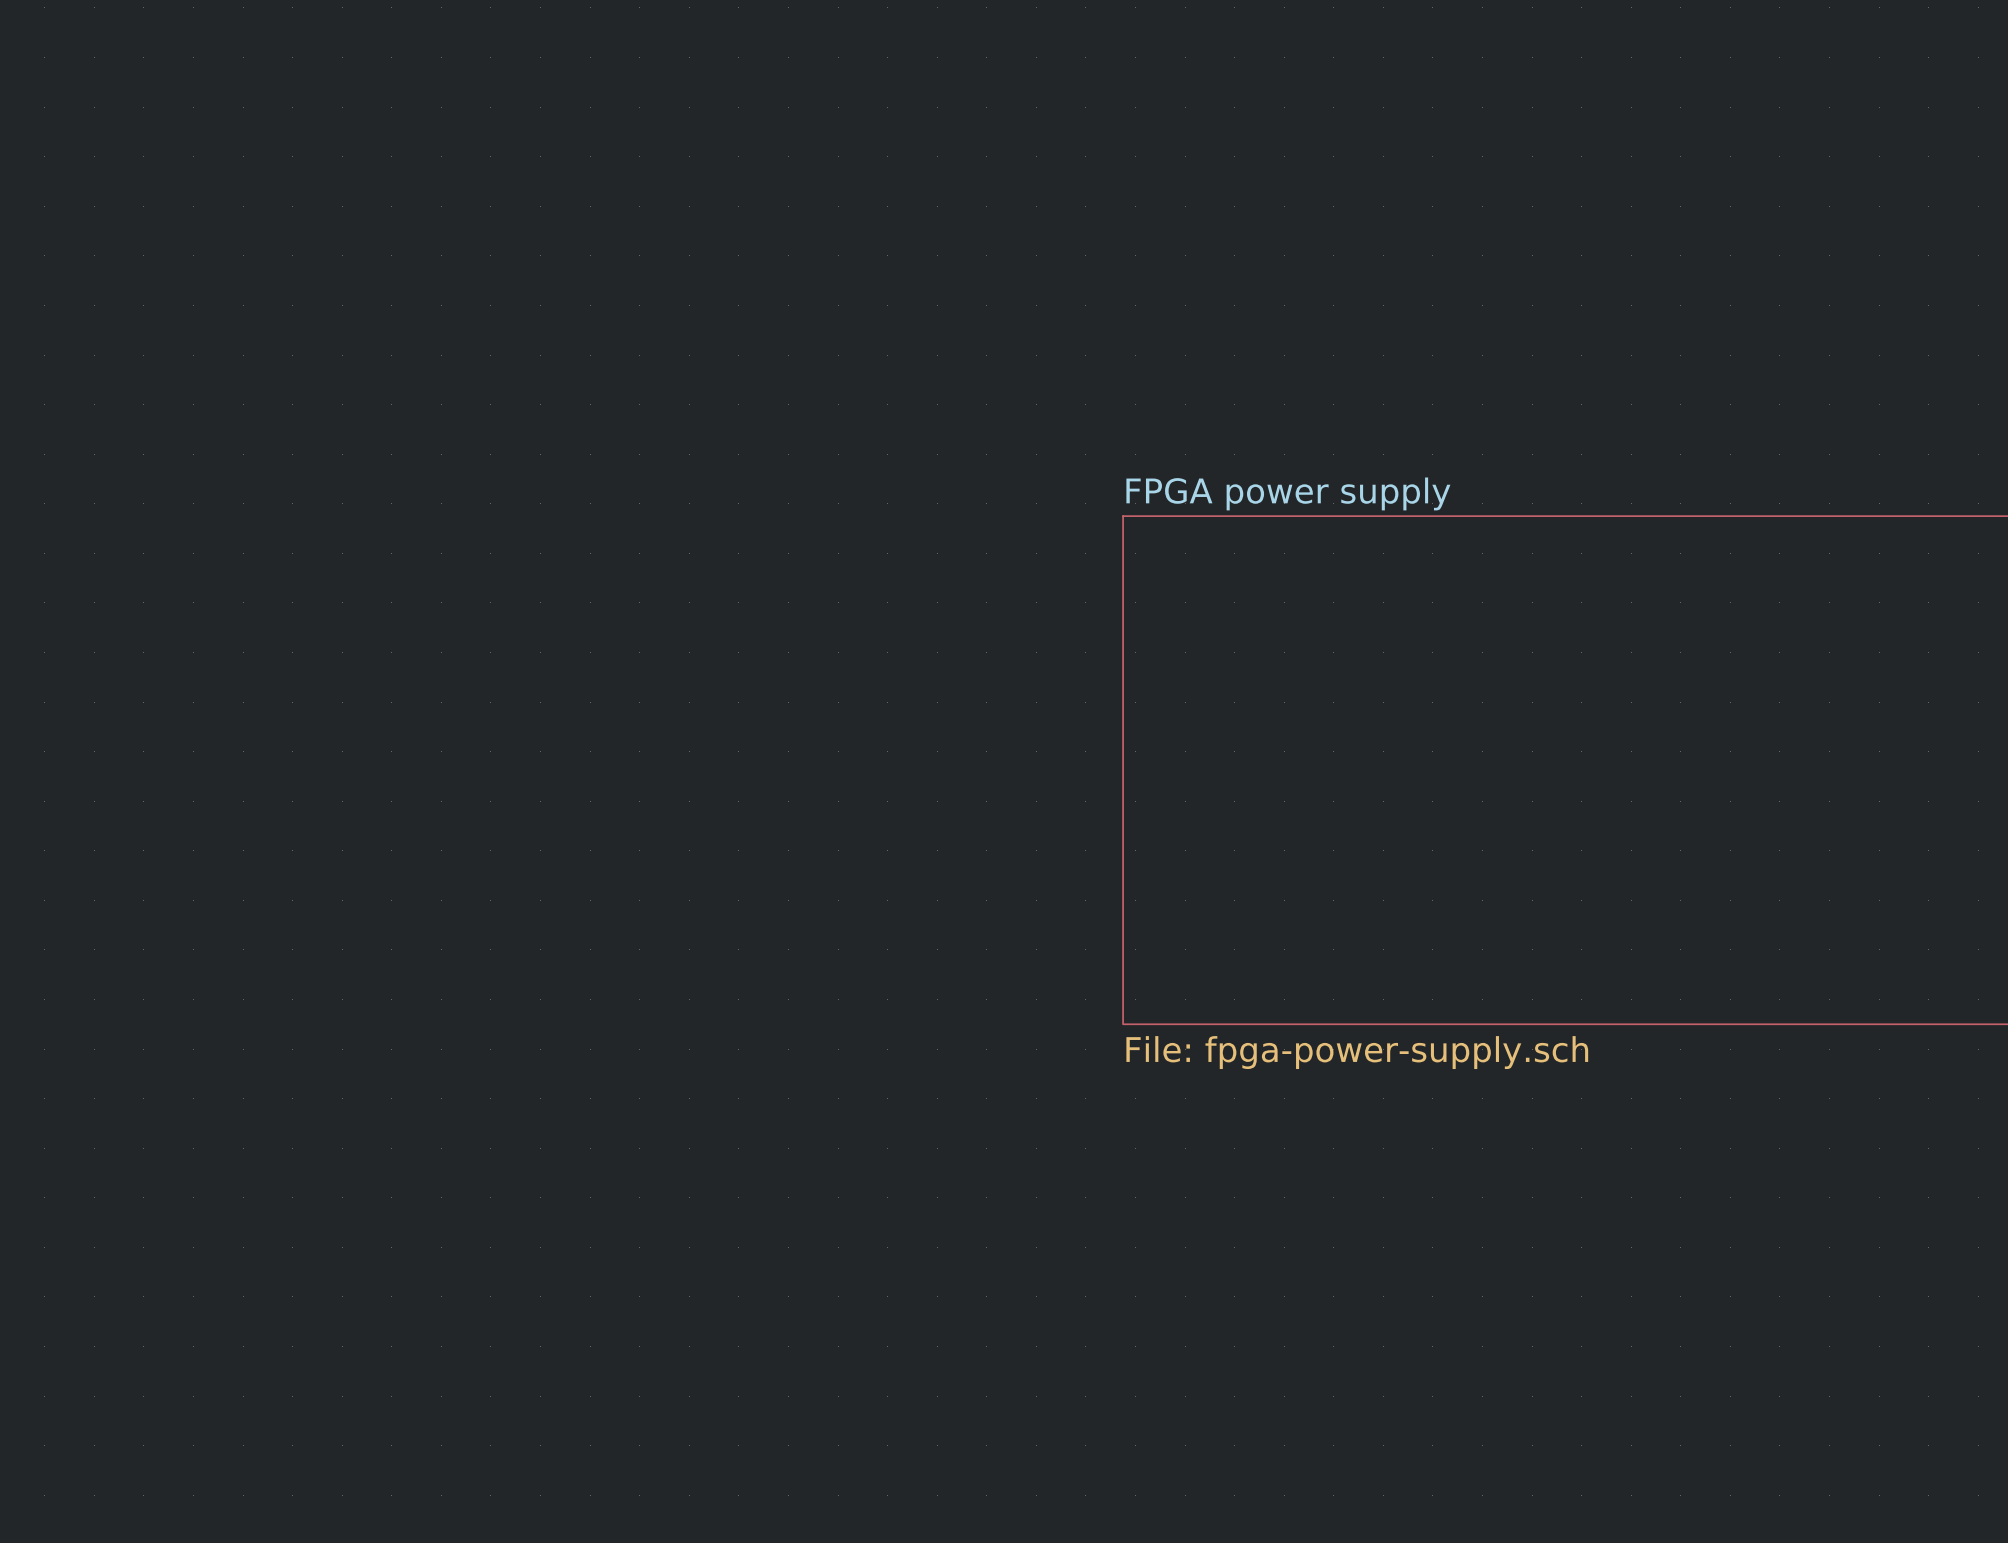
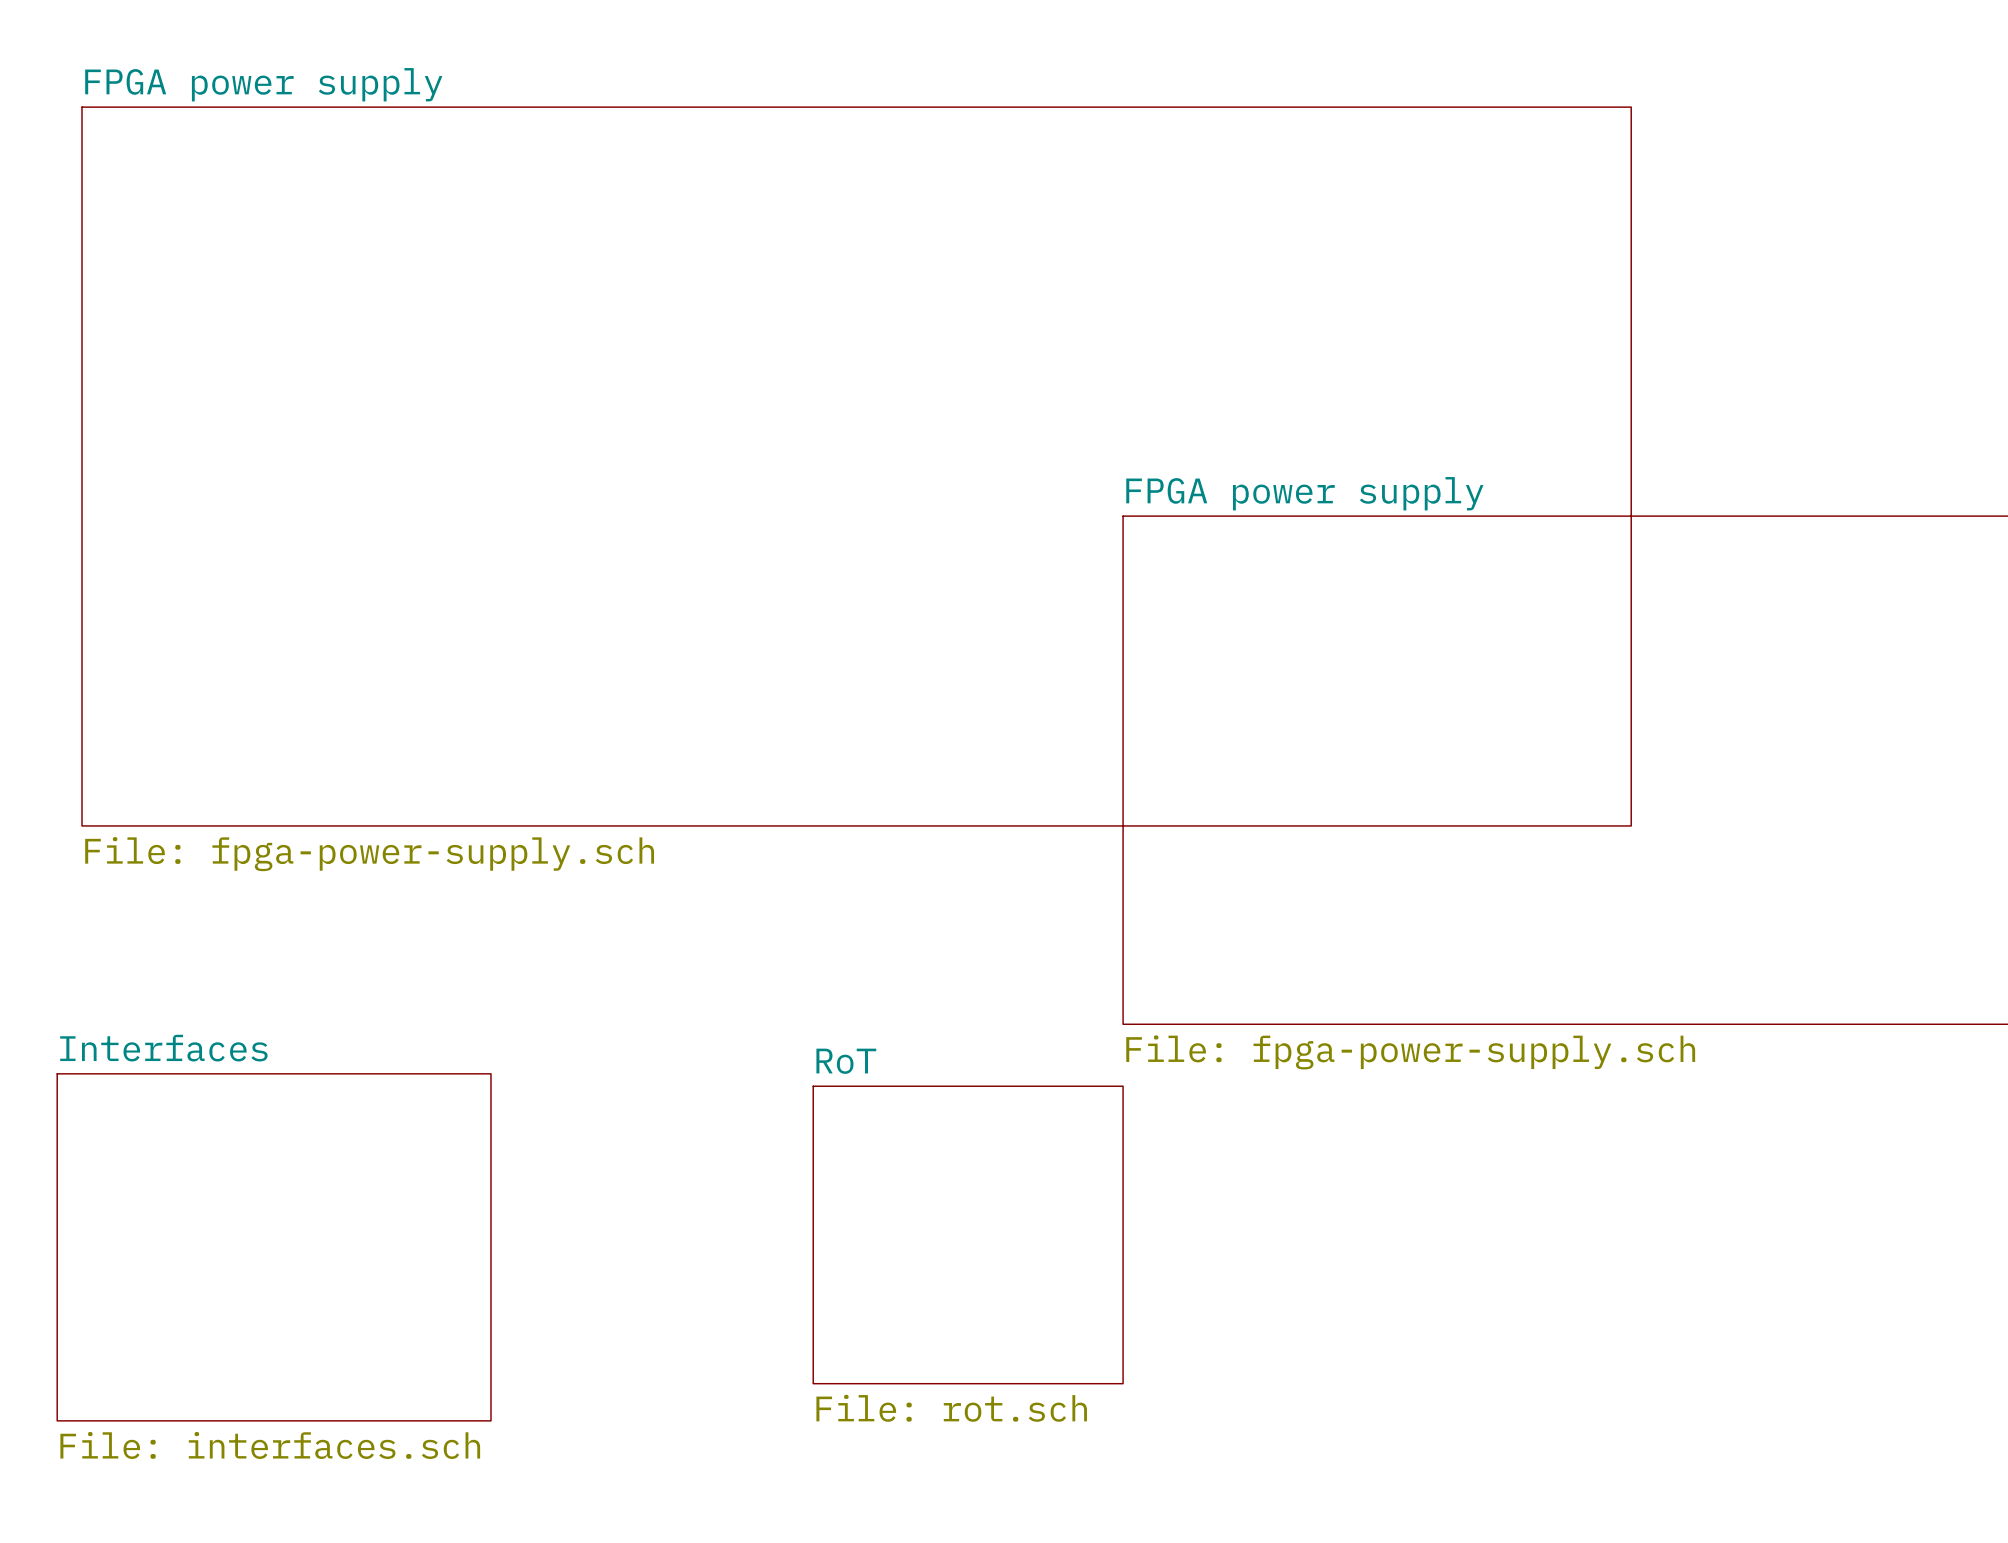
sheet FPGA power supply: none -> File: fpga-power-supply.sch (856, 466)
sheet RoT: none -> File: rot.sch (968, 1234)
sheet Interfaces: none -> File: interfaces.sch (274, 1247)

